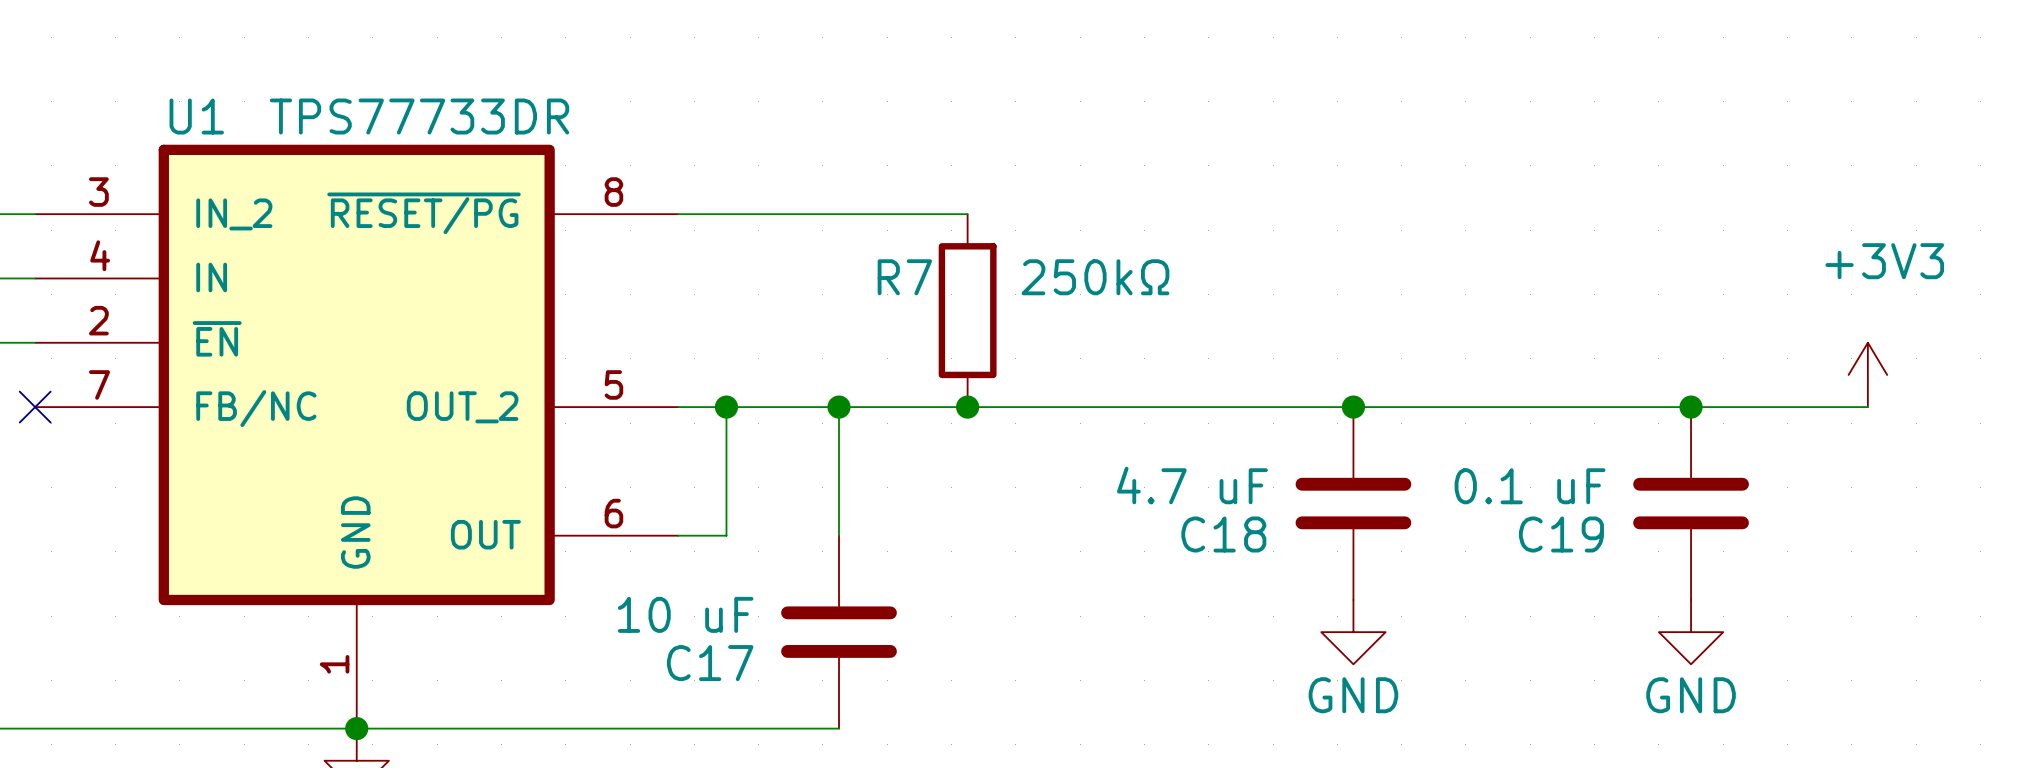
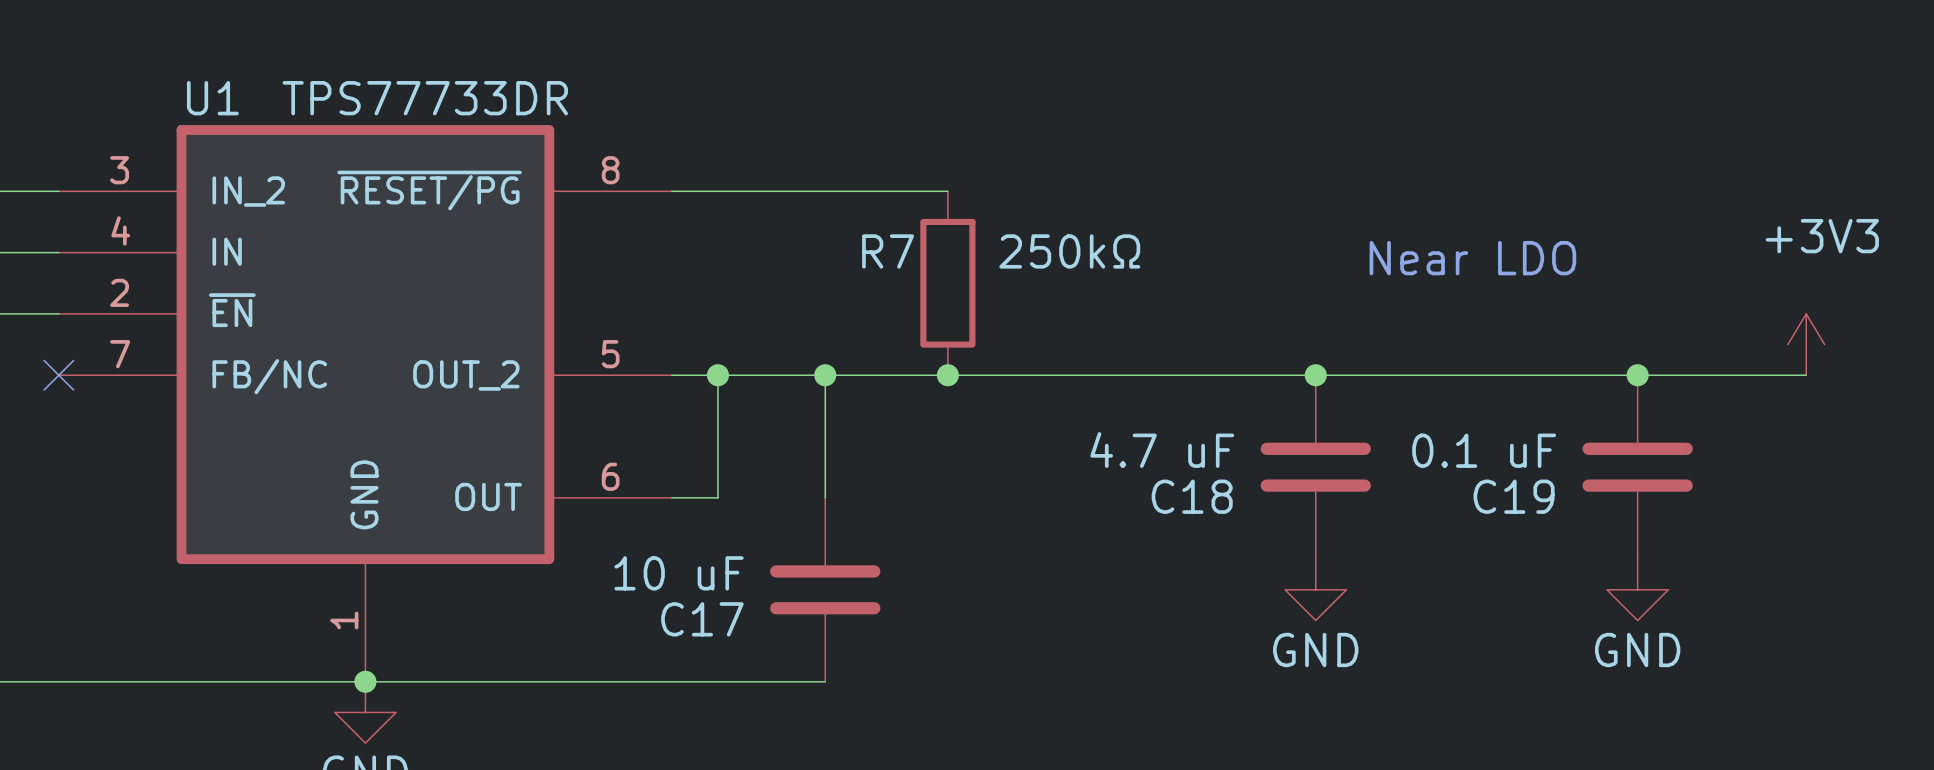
text: none -> Near LDO (1472, 258)

